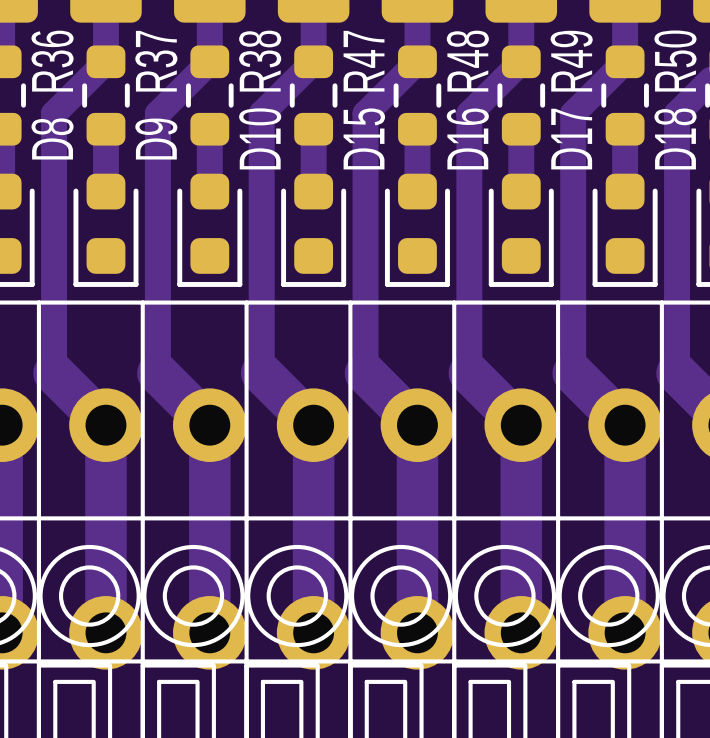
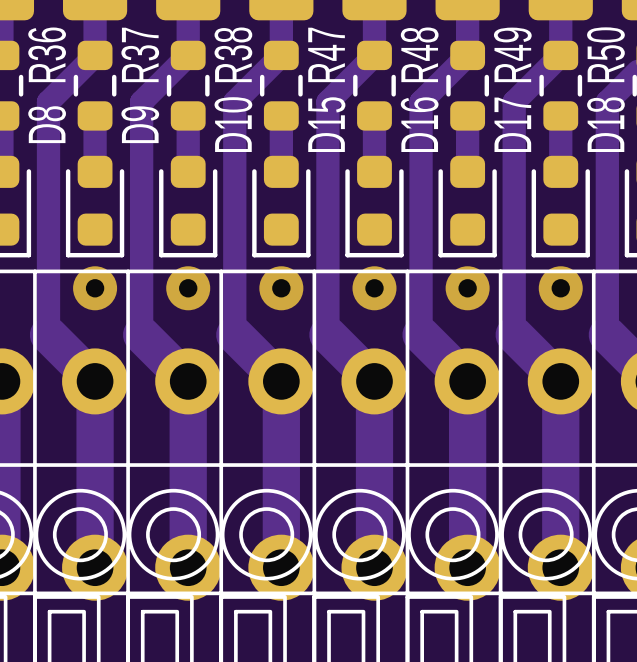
via: none -> (95, 288)
via: none -> (188, 288)
via: none -> (281, 288)
via: none -> (374, 288)
via: none -> (467, 288)
via: none -> (560, 288)

